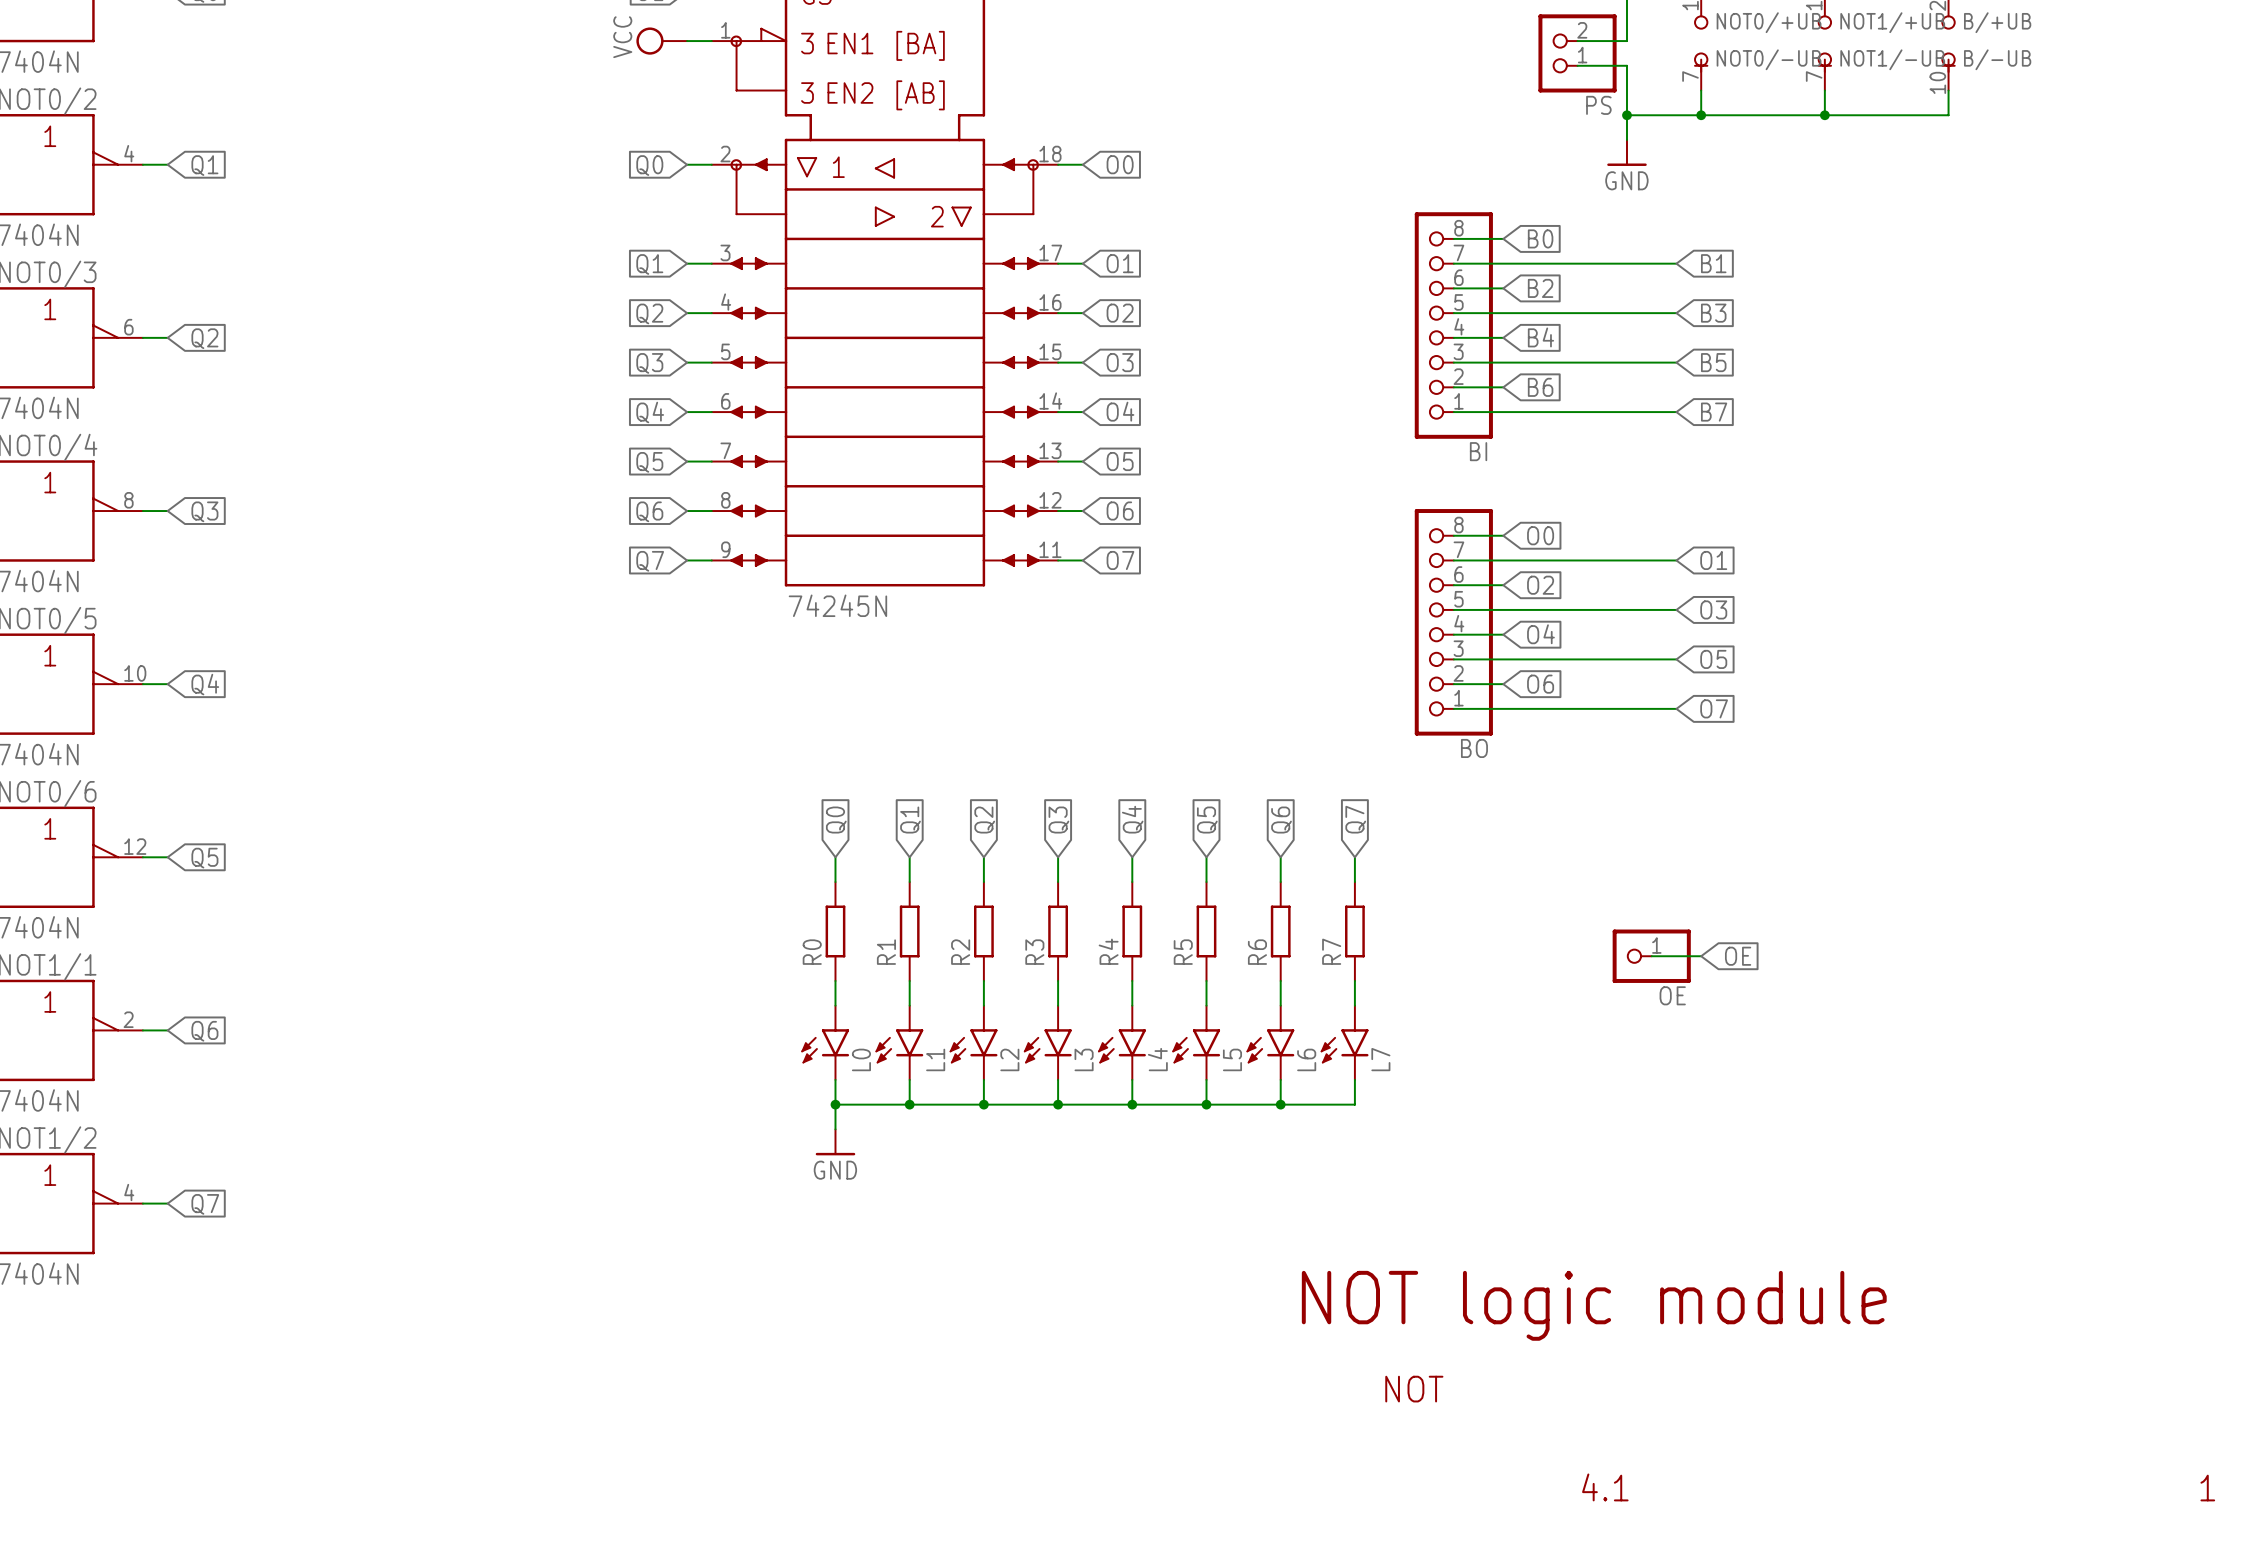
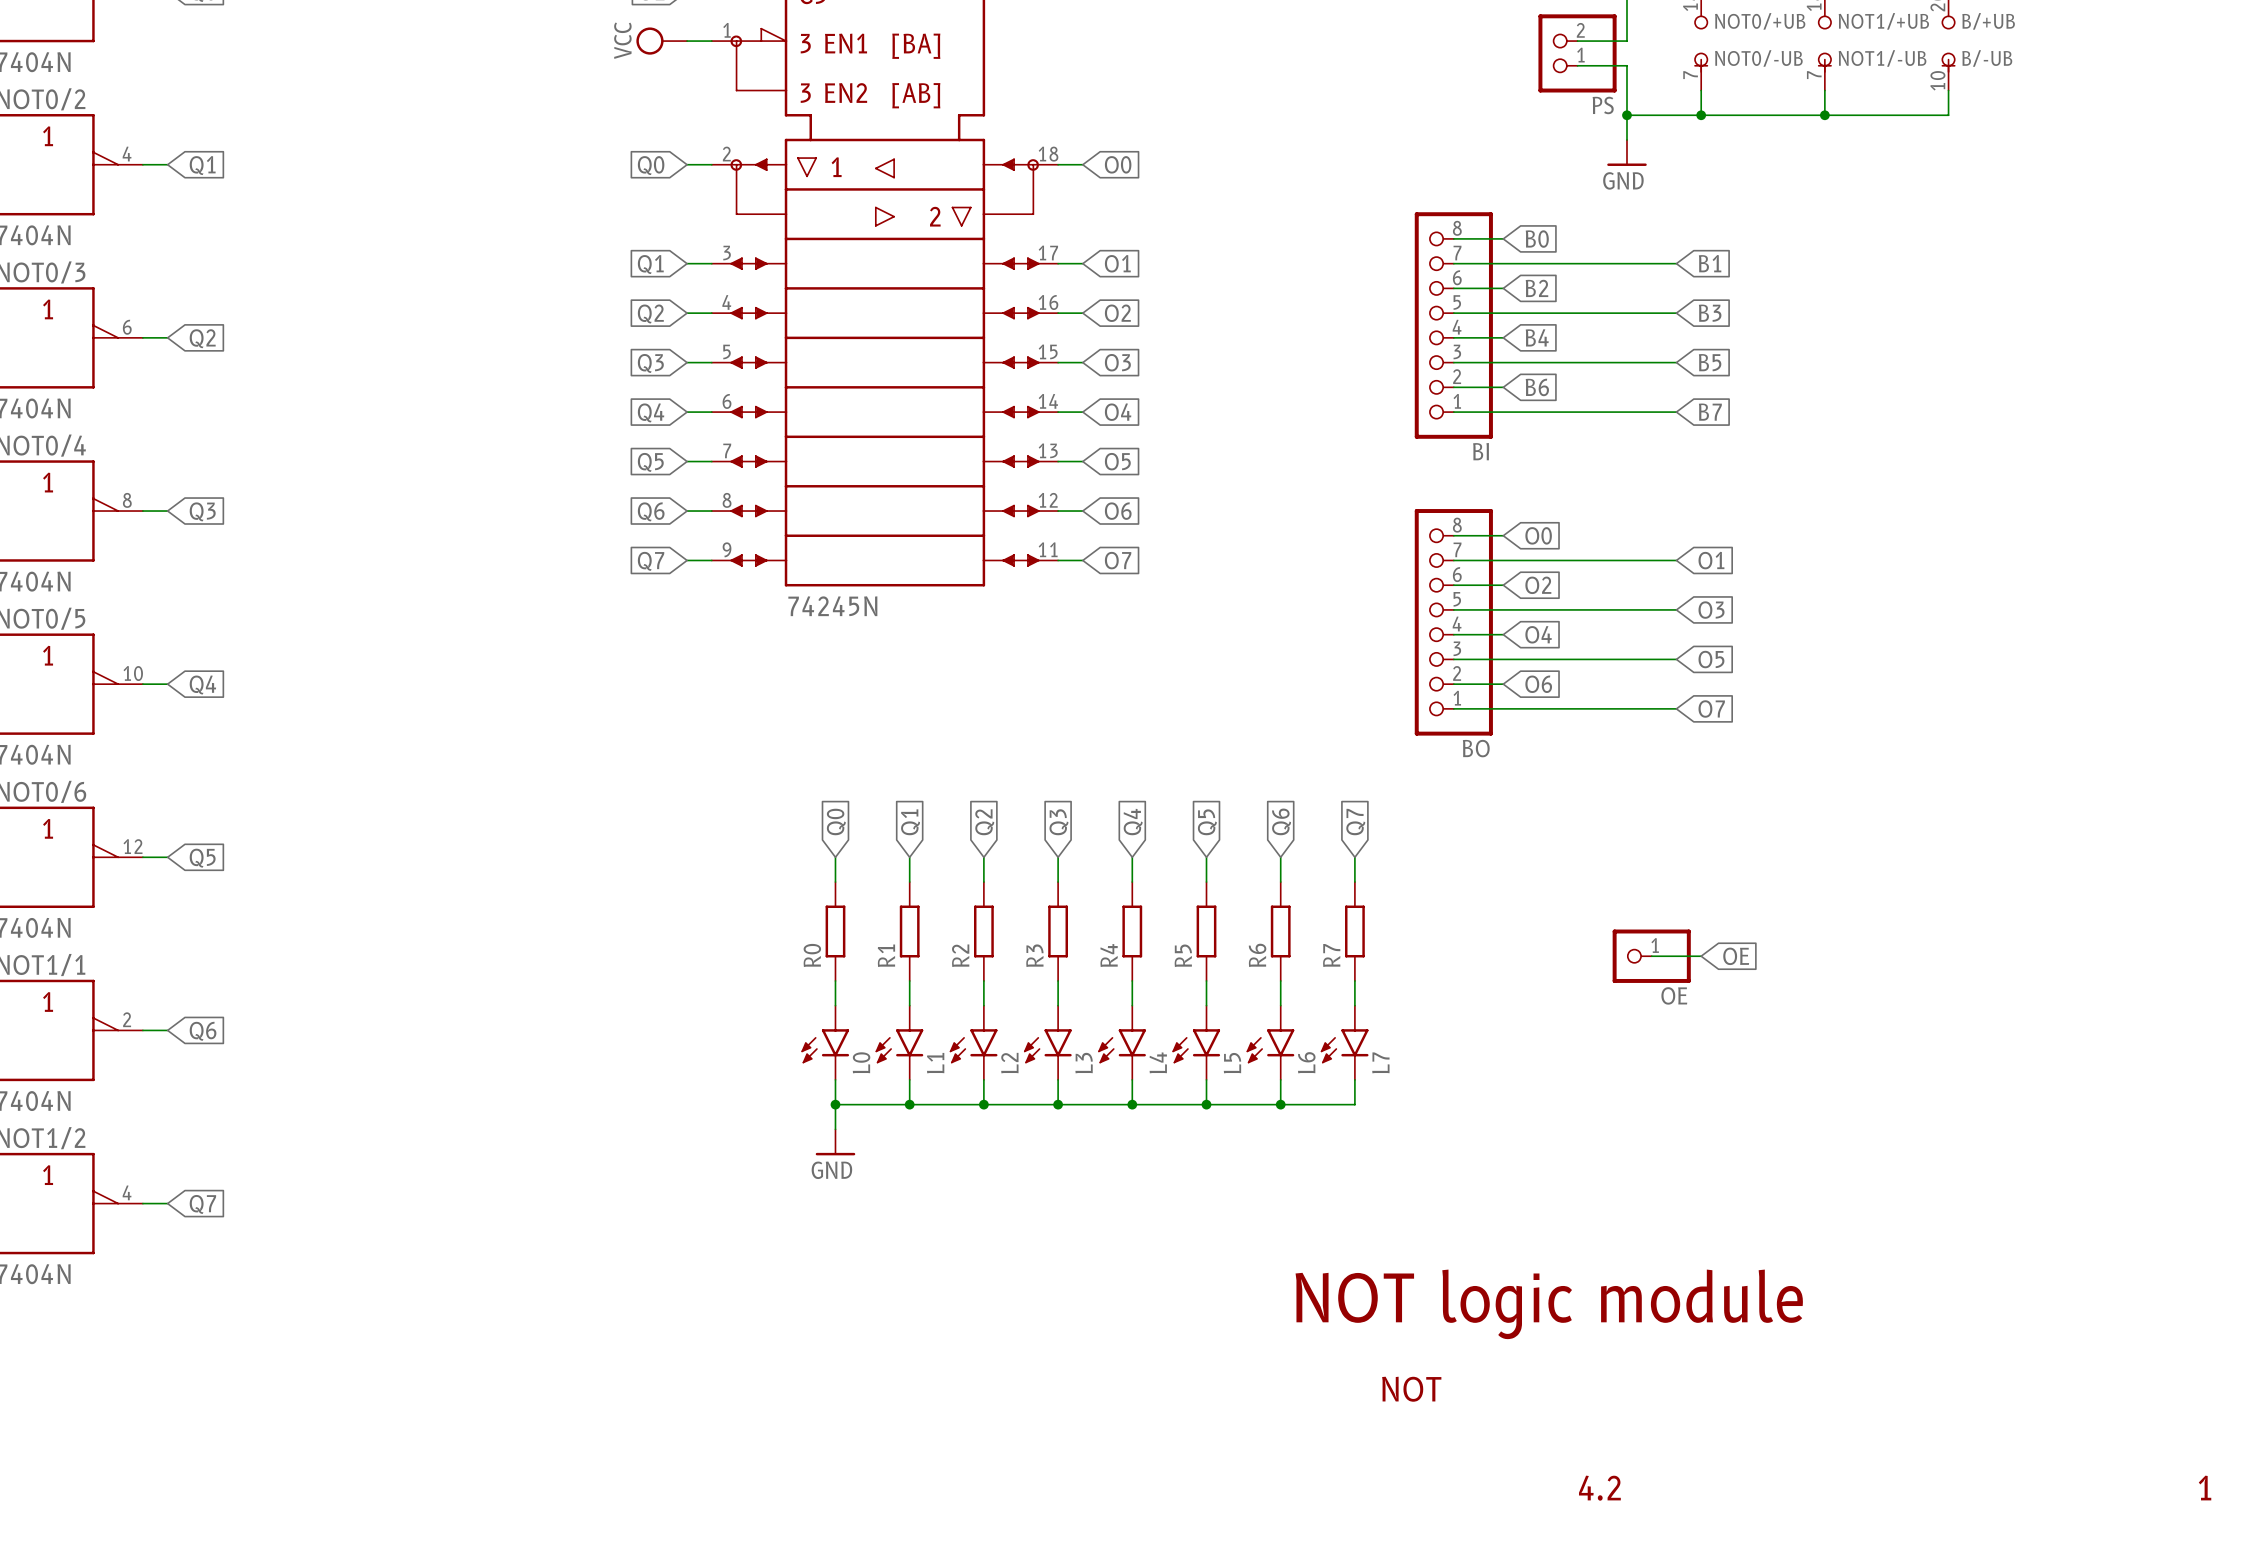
text: 4.1 (1605, 1487) -> 4.2 (1599, 1488)

